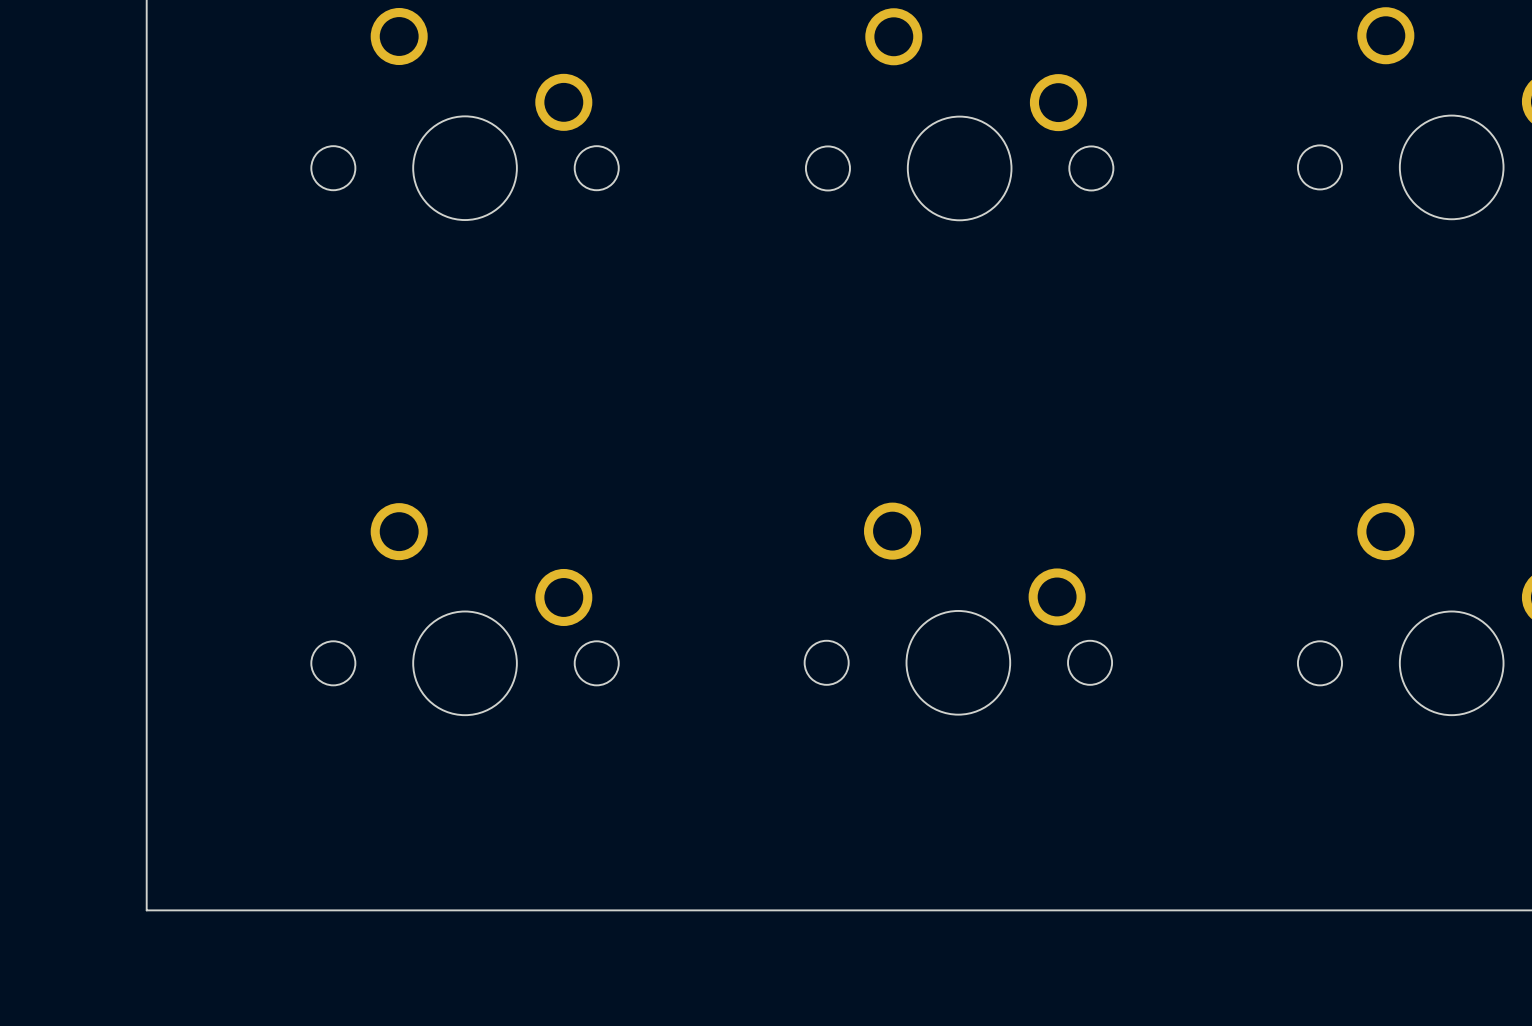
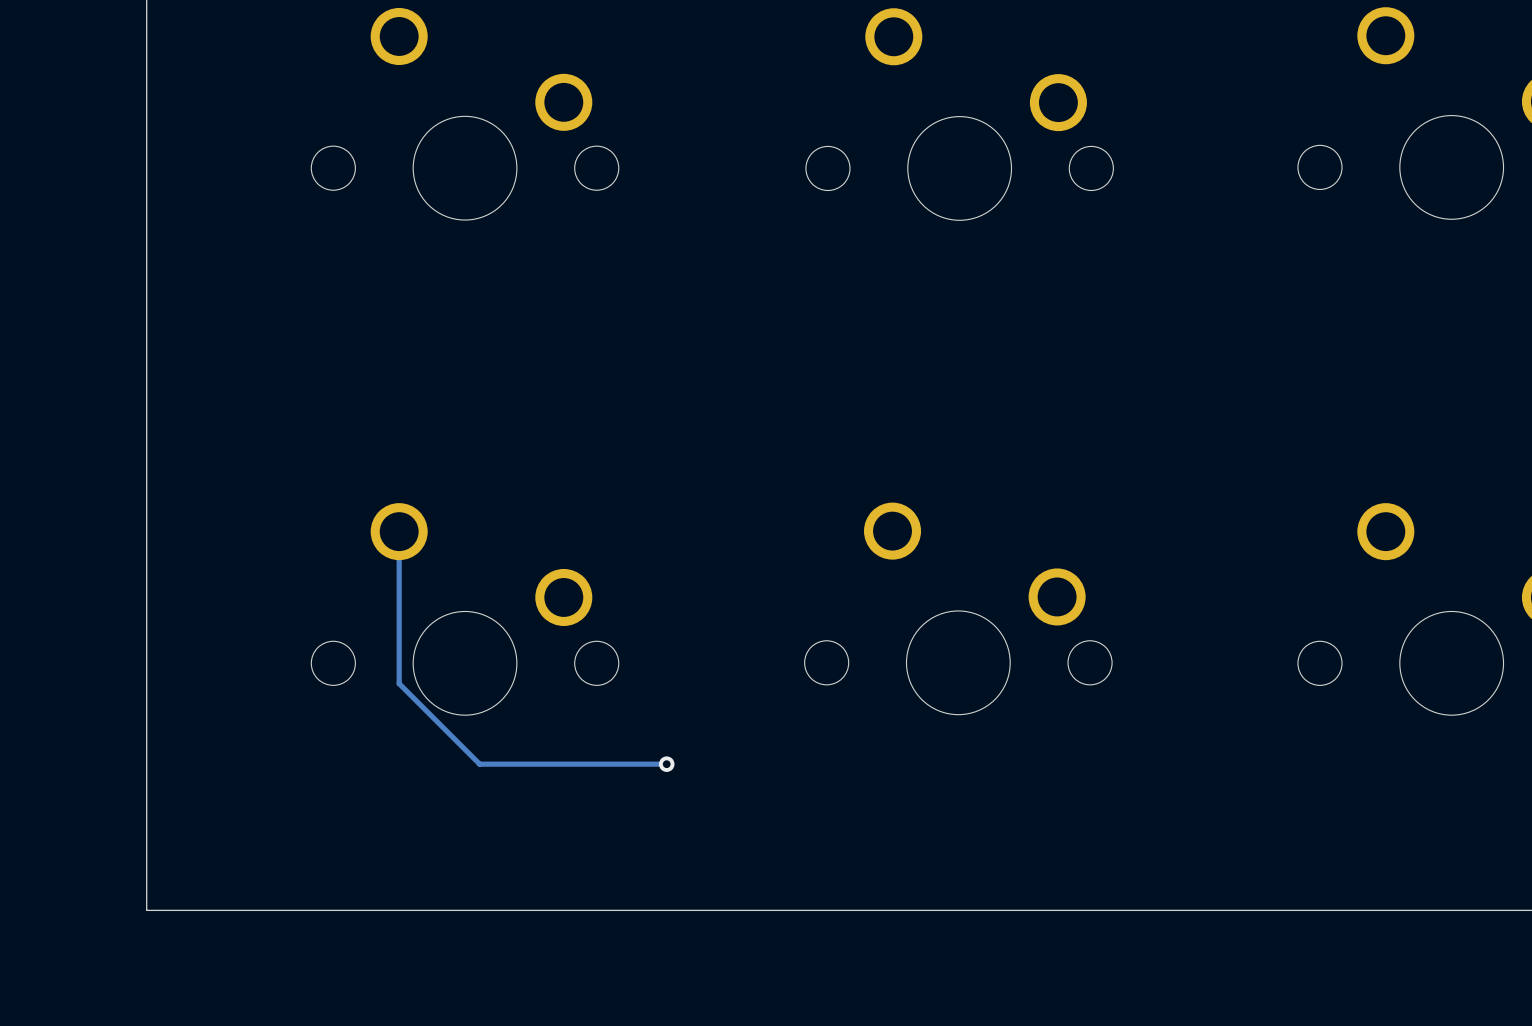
track: none -> (399, 531) (399, 683) (479, 764) (666, 764)
via: none -> (666, 764)

